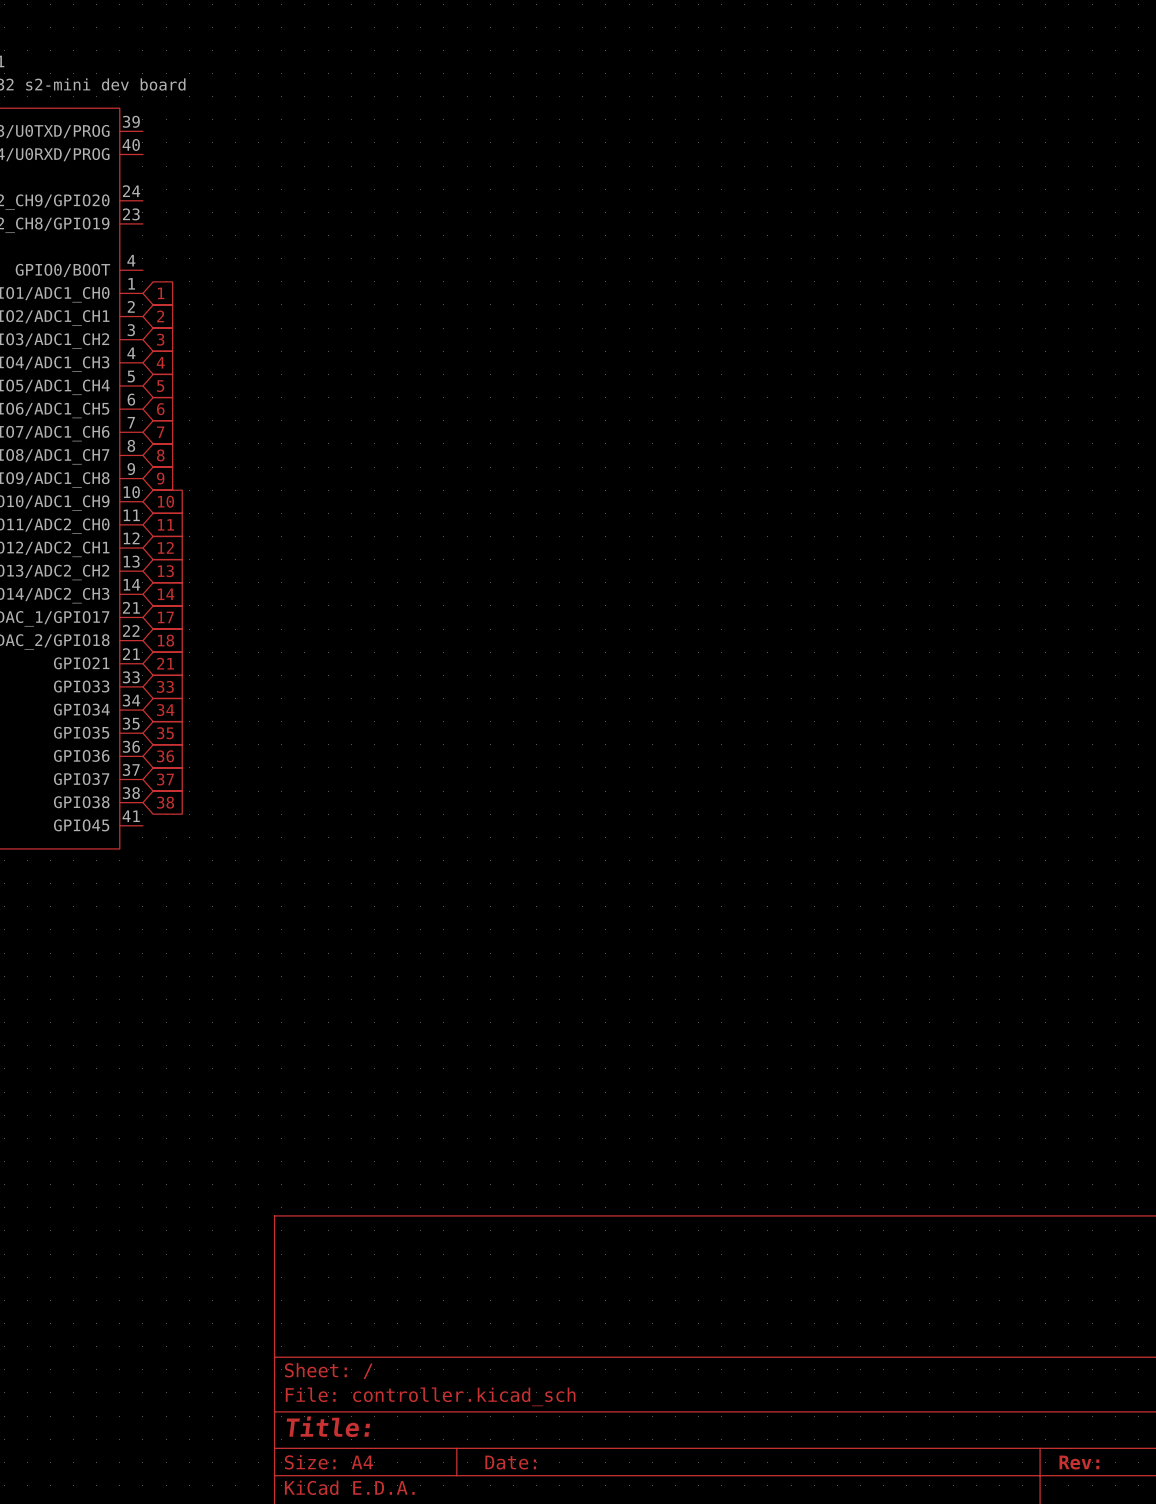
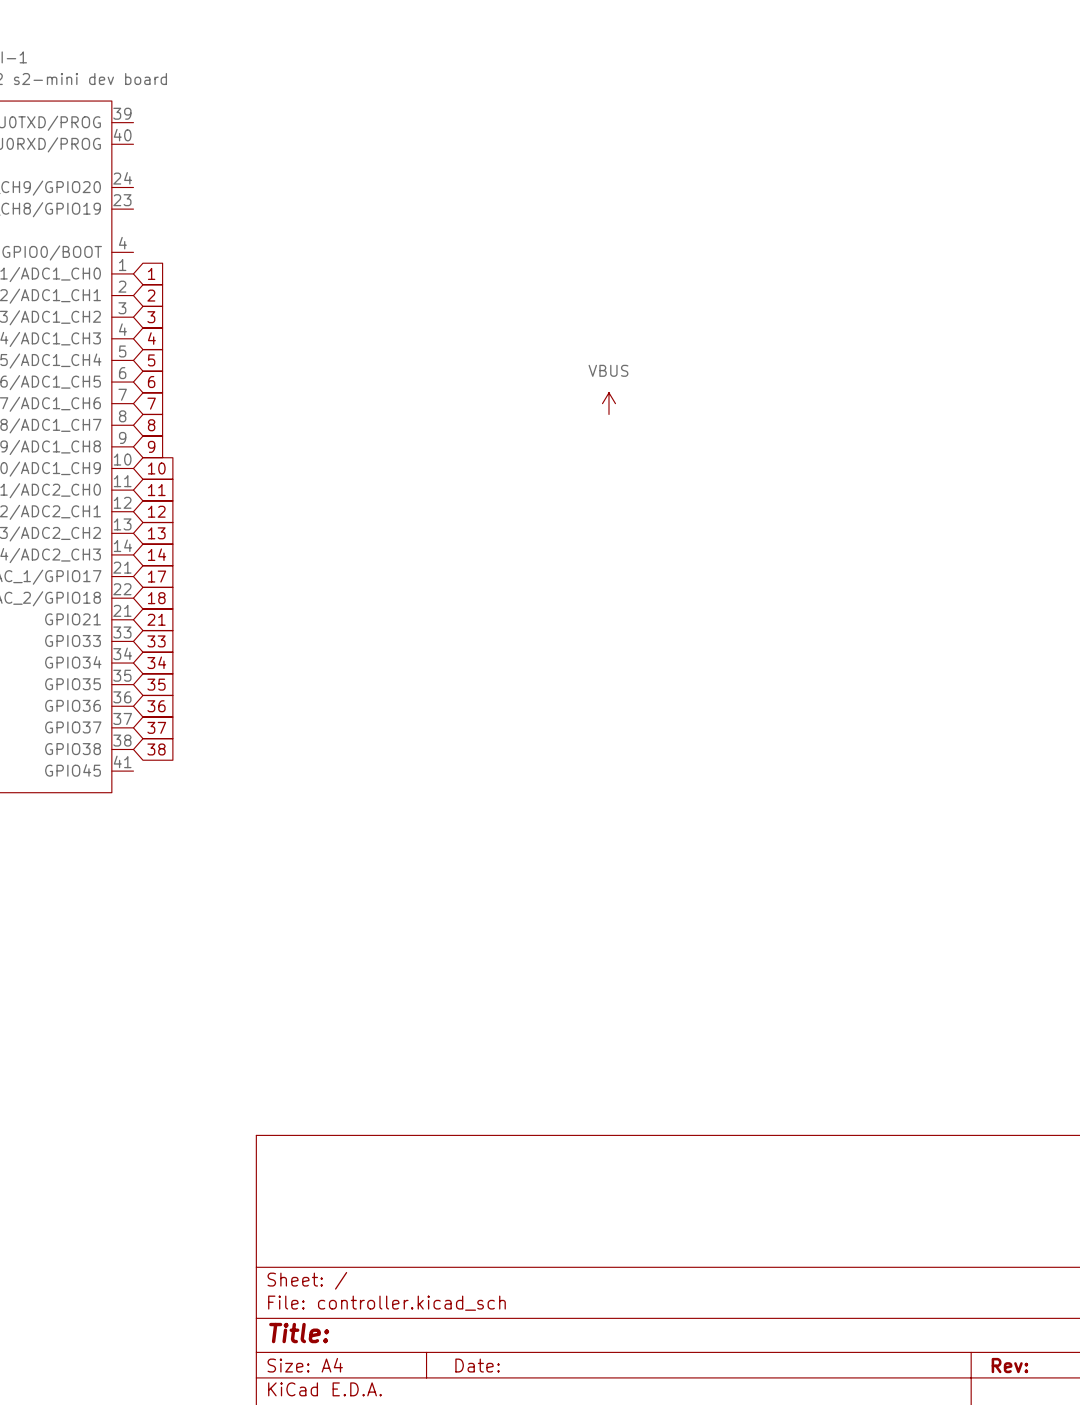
power symbol: none -> VBUS (608, 403)

